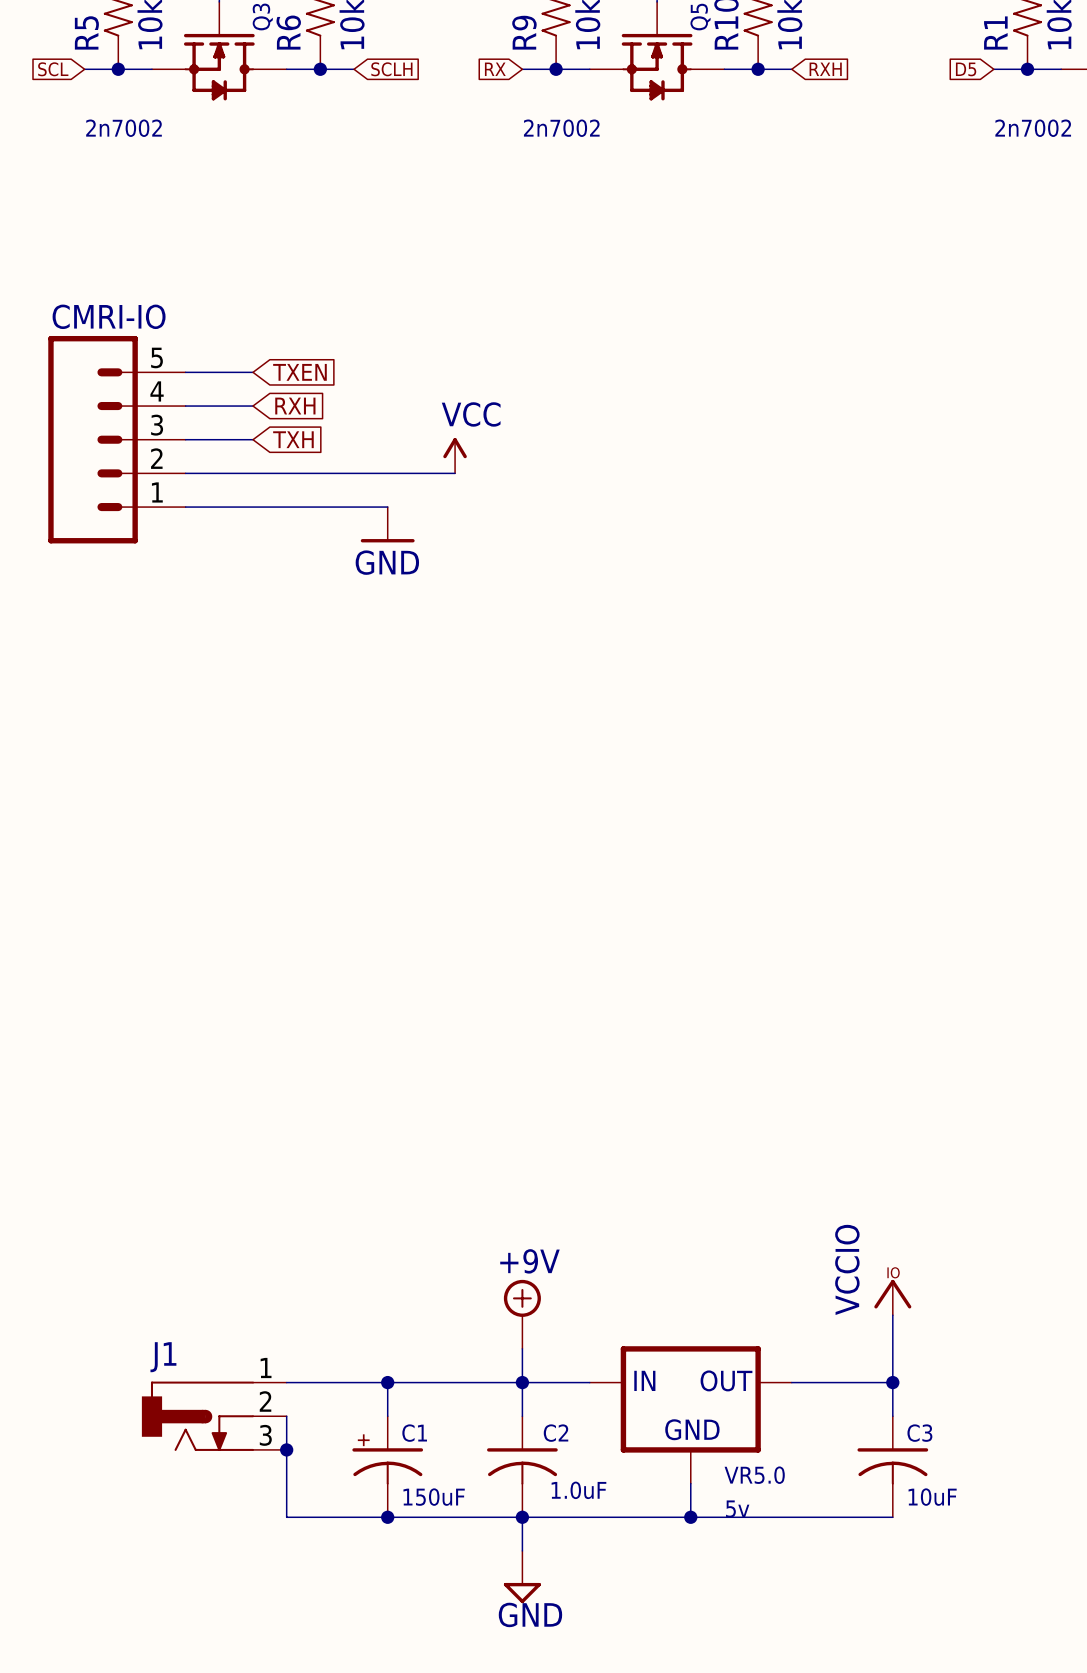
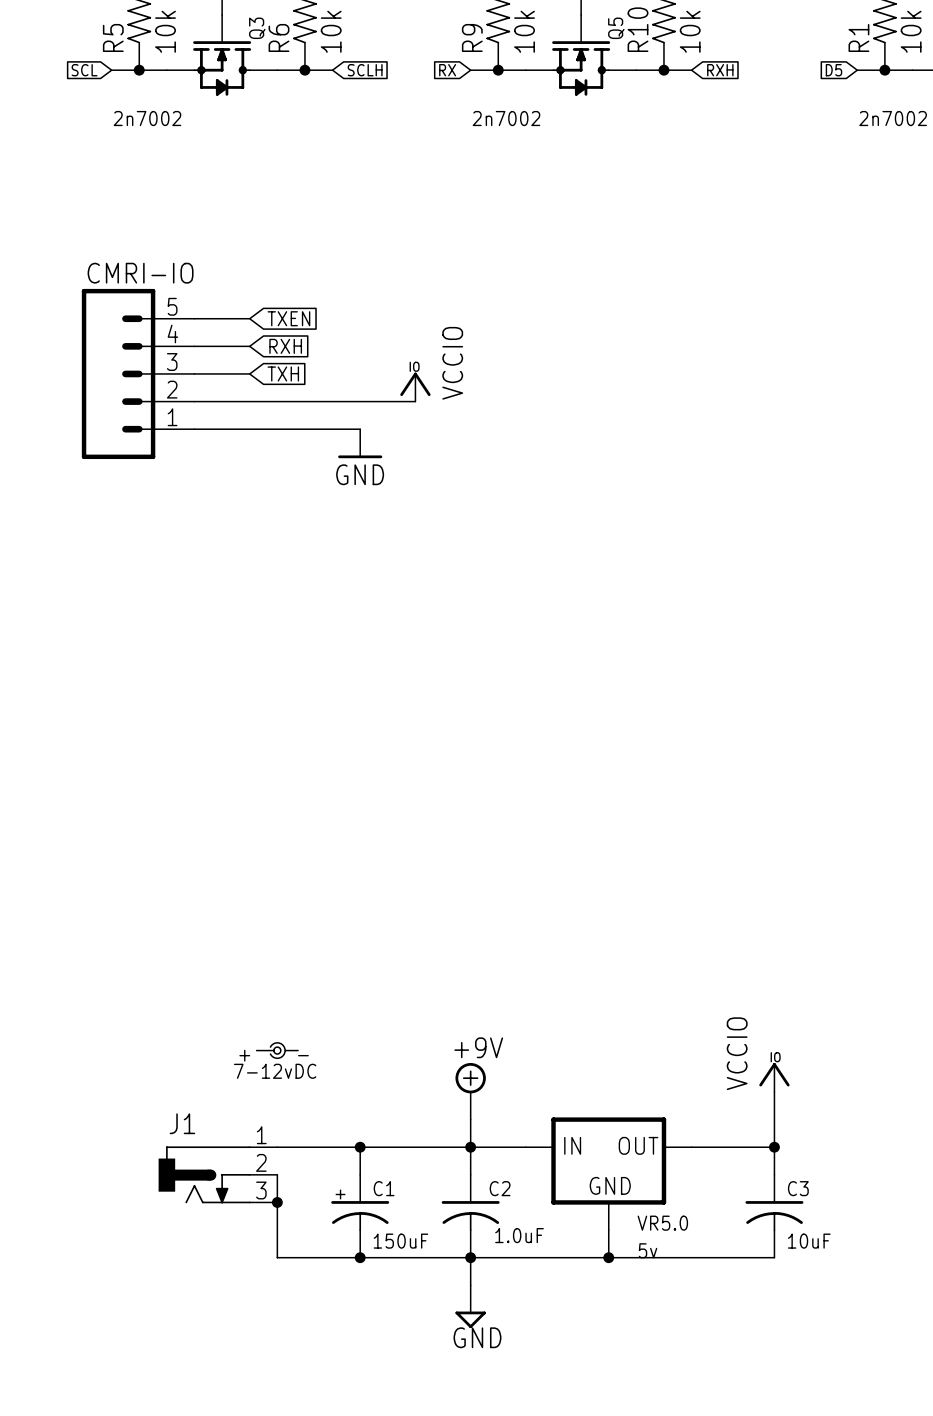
power symbol: VCC (455, 455) -> VCCIO (415, 387)
part: none -> 7-12vDC (277, 1050)

